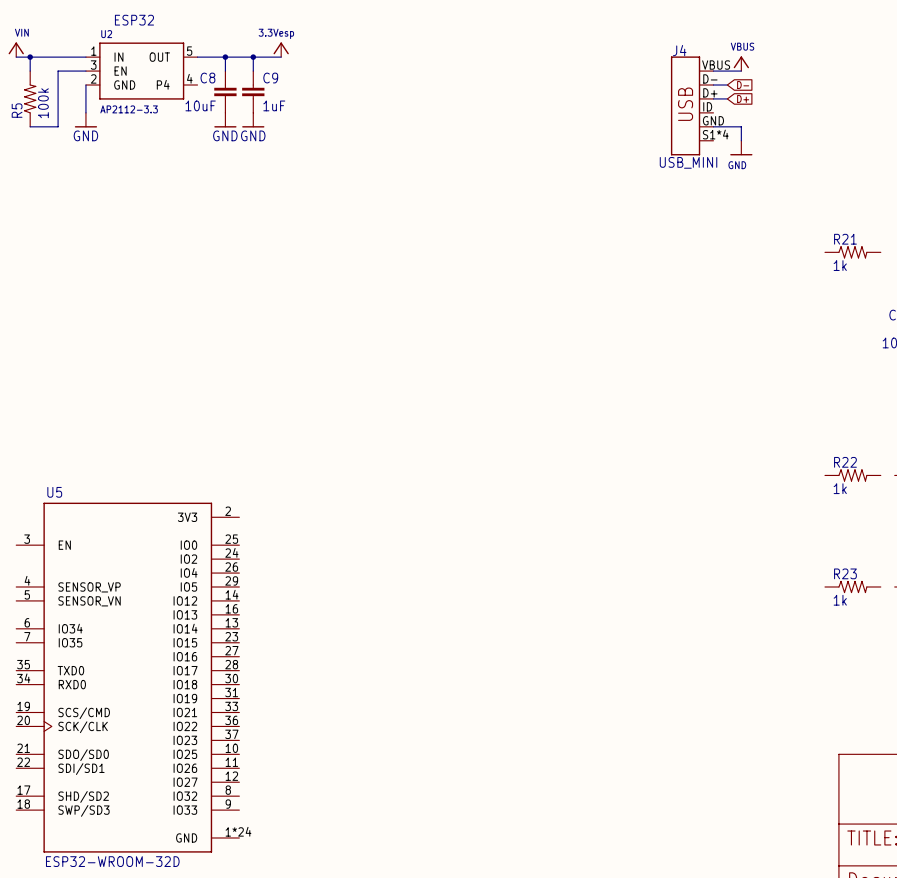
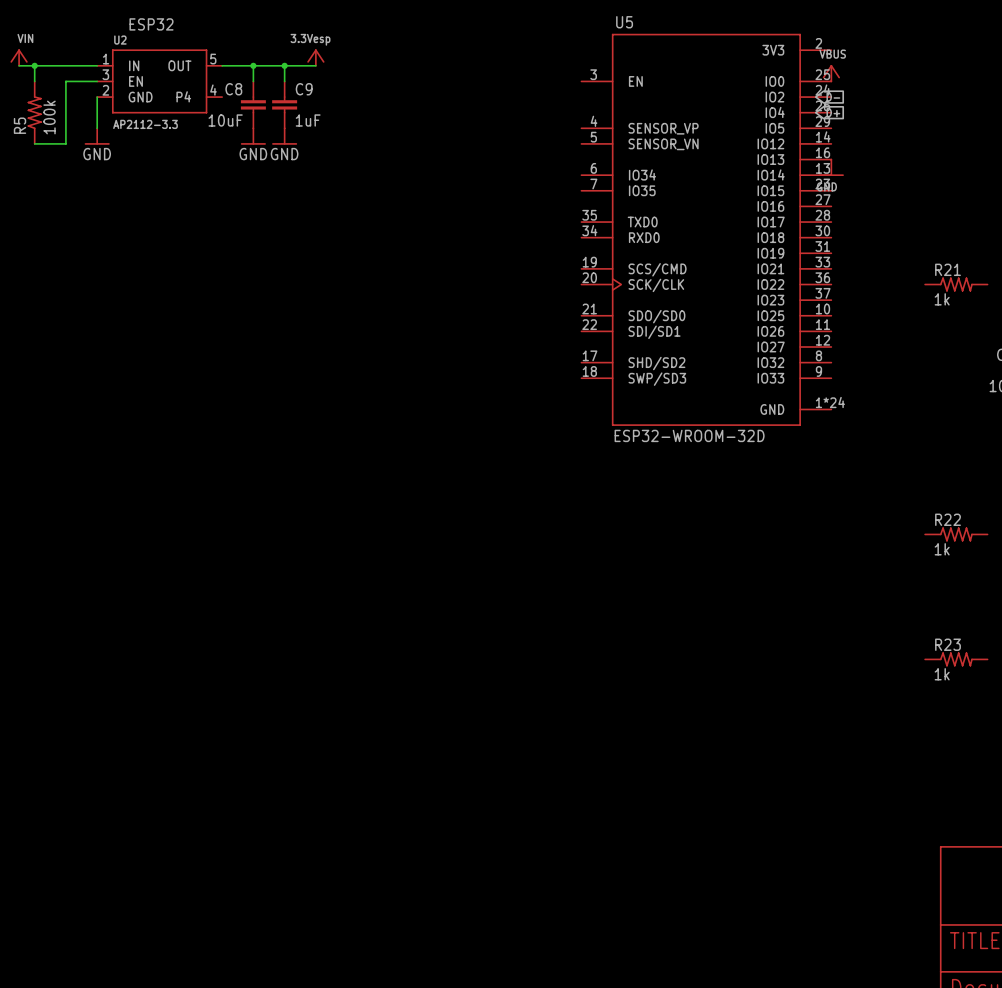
J4: USB_MINI (692, 105) -> none
U5 position: (127, 677) -> (706, 229)

